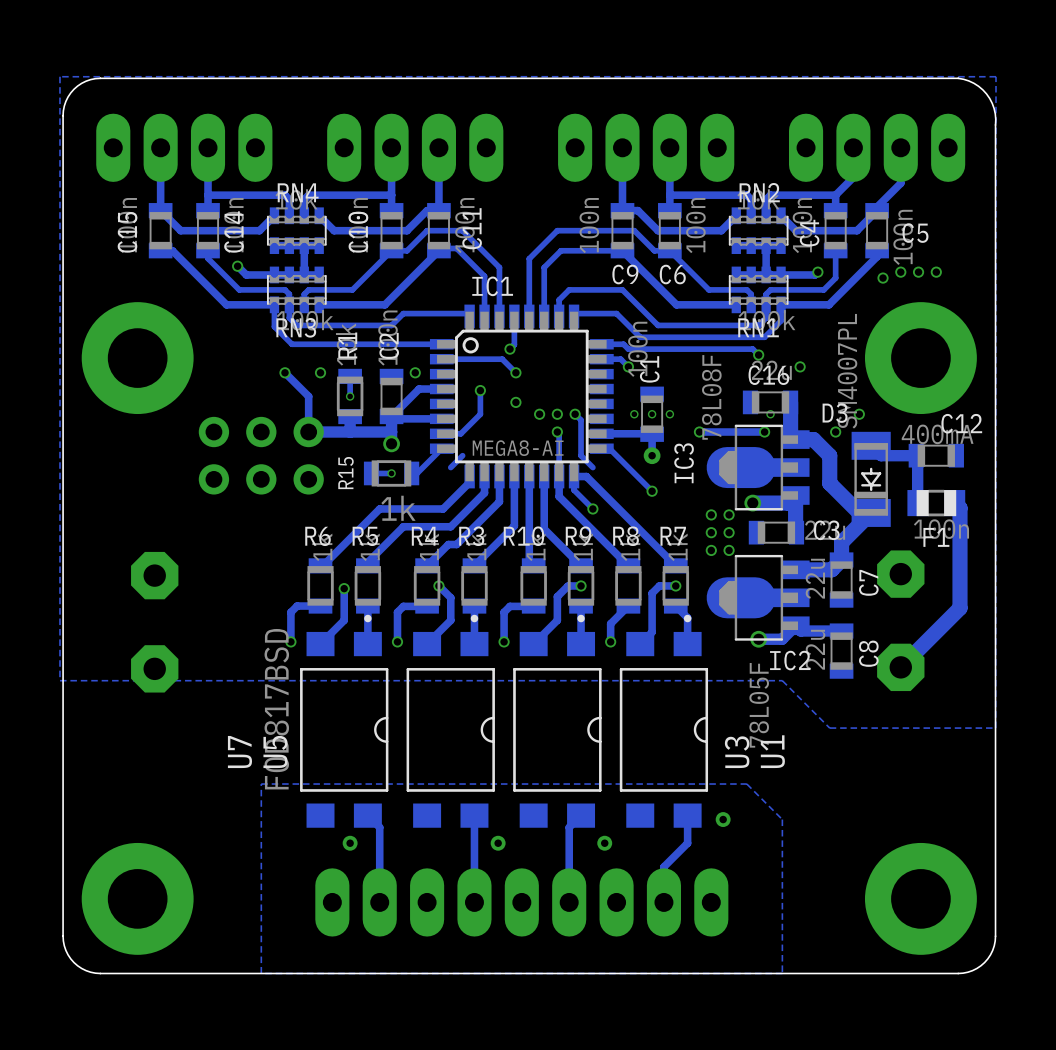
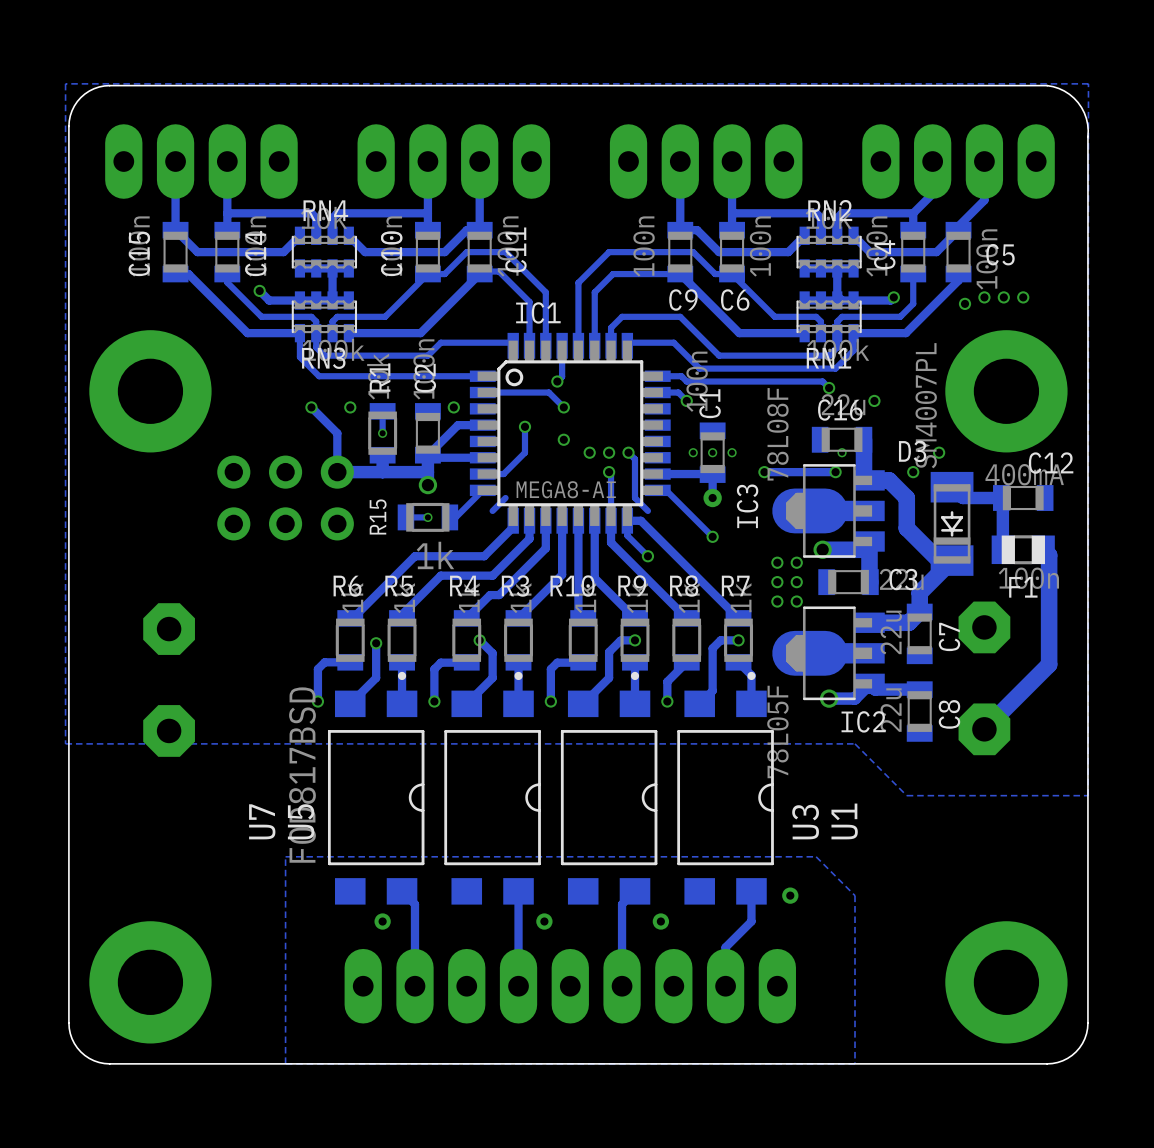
IC2 value position: 78L05F (759, 705) -> 78L05F (777, 731)

